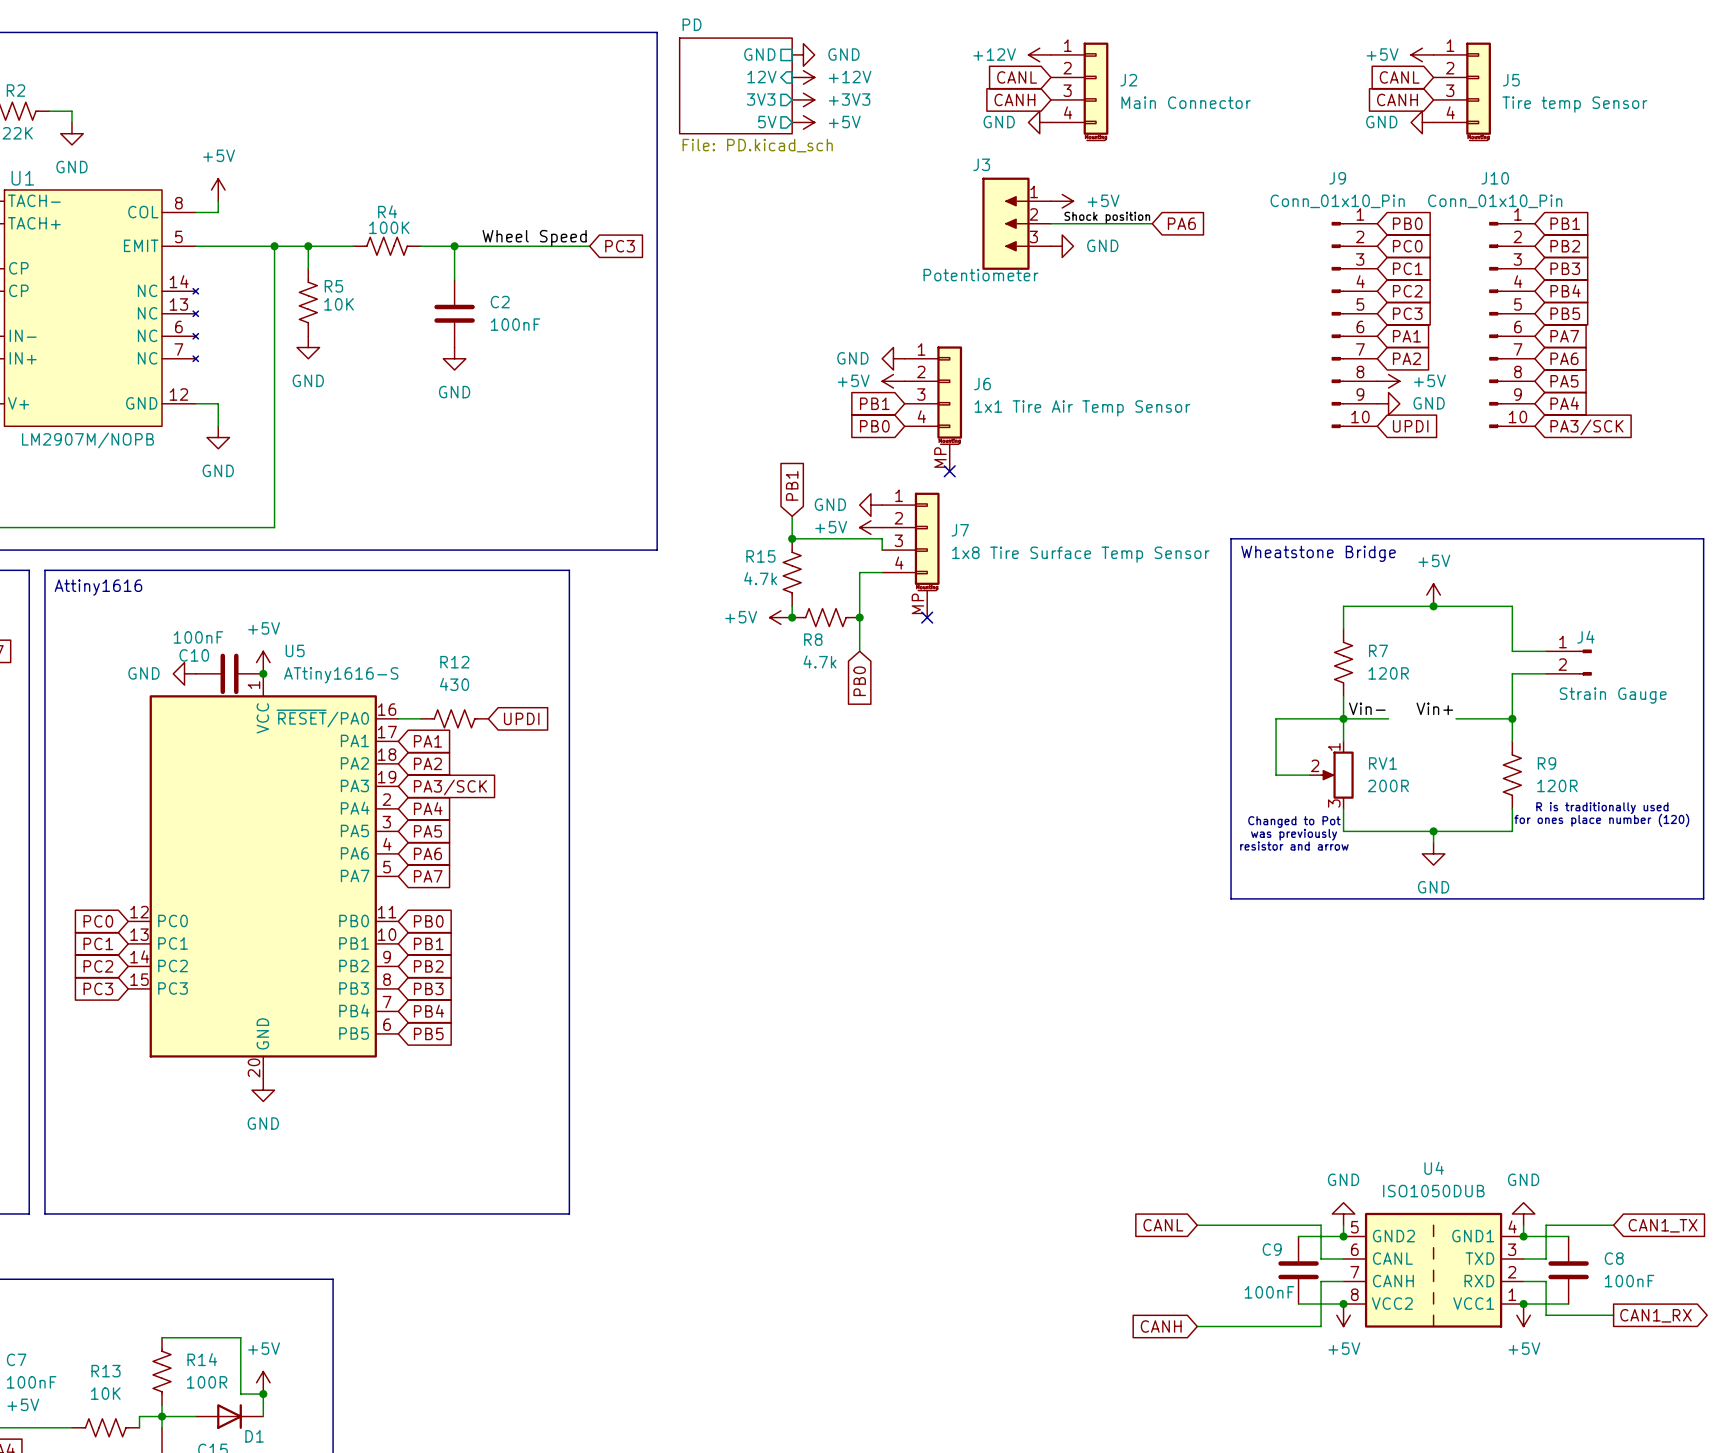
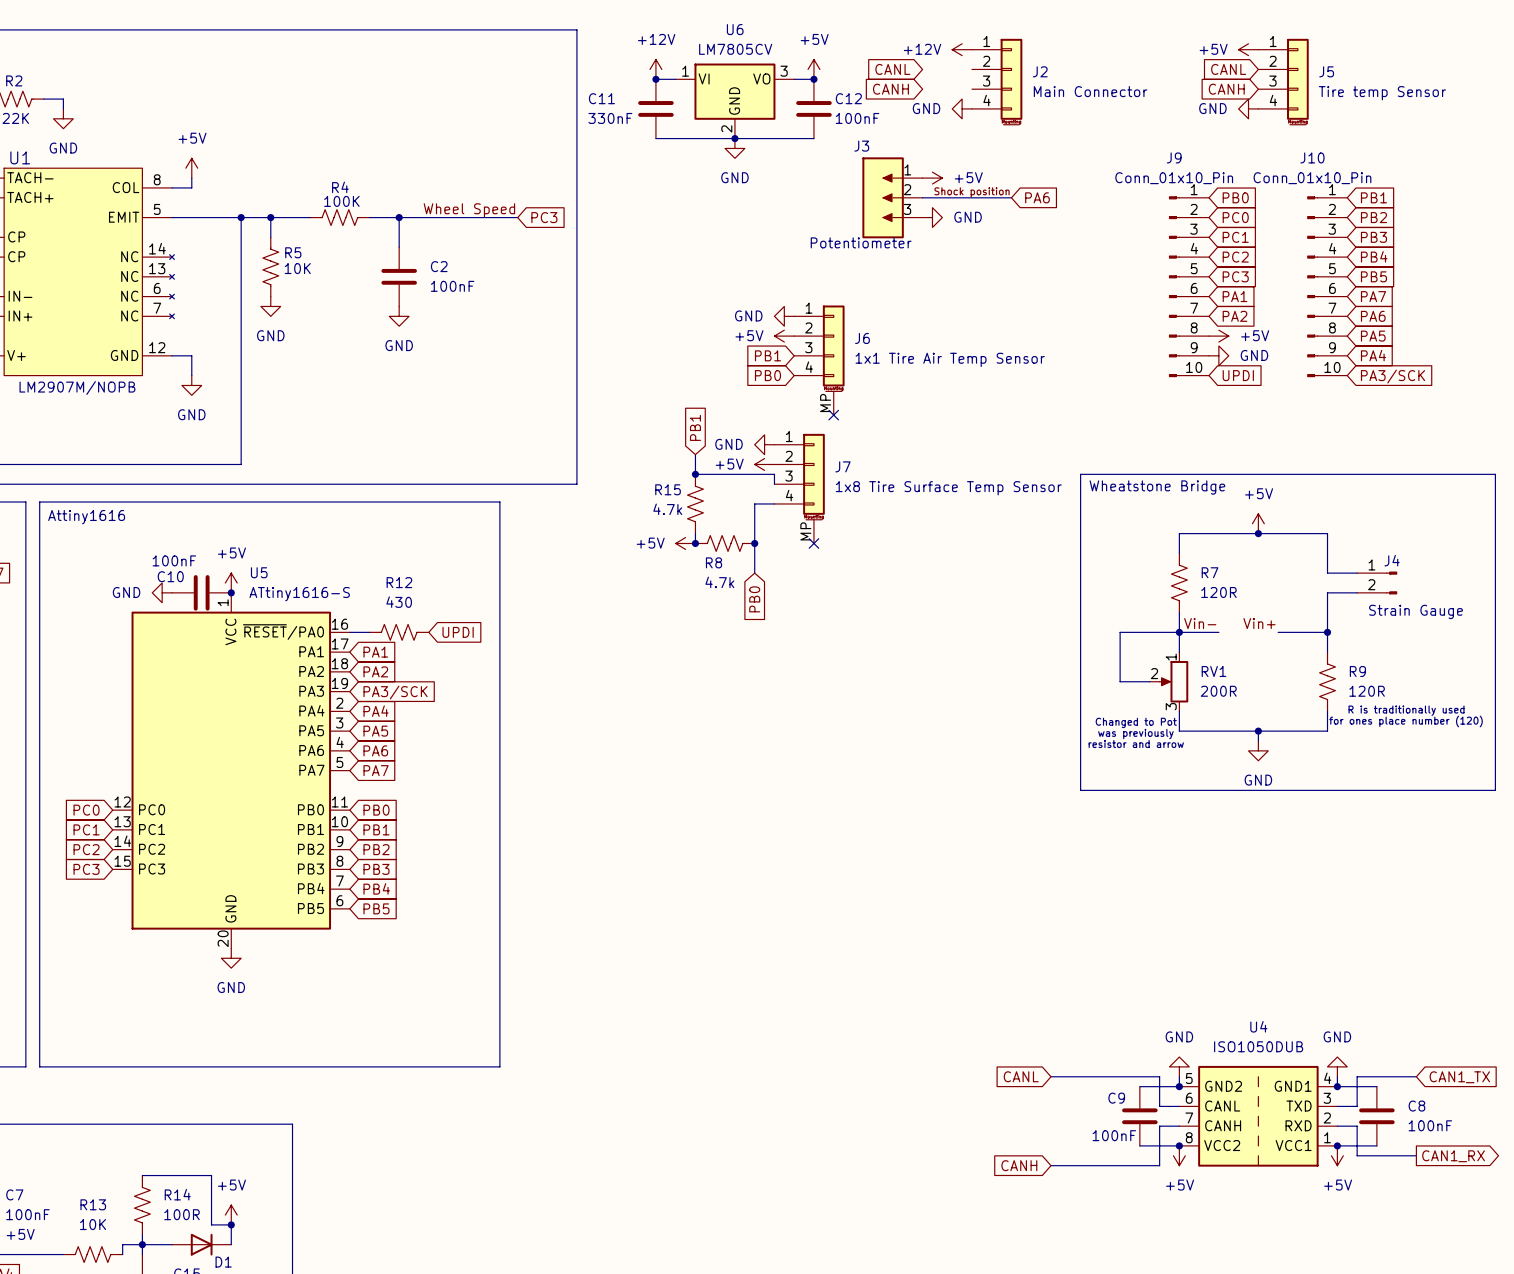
sheet pin: GND (759, 54) -> none
power symbol: GND (803, 54) -> none
power symbol position: +12V (1039, 54) -> +12V (962, 49)
sheet pin: 12V (761, 77) -> none
power symbol rotation: 0° (803, 77) -> 90° counterclockwise (655, 69)
power symbol position: +12V (803, 77) -> +12V (655, 69)
sheet PD: File: PD.kicad_sch (735, 85) -> none
wire: none -> (655, 79) (675, 79)
junction: none -> (655, 79)
wire: none -> (794, 79) (813, 79)
junction: none -> (813, 79)
J2 position: (1079, 91) -> (997, 82)
sheet pin: 3V3 (761, 99) -> none
power symbol: +3V3 (803, 99) -> none
U6: none -> LM7805CV (734, 101)
C11: none -> 330nF (655, 108)
sheet pin: 5V (767, 122) -> none
power symbol rotation: 0° (803, 122) -> 90° counterclockwise (813, 69)
power symbol position: +5V (803, 122) -> +5V (813, 69)
C12: none -> 100nF (813, 108)
power symbol position: GND (1039, 122) -> GND (962, 108)
wire: none -> (655, 138) (813, 138)
junction: none -> (734, 138)
power symbol: none -> GND (734, 148)

